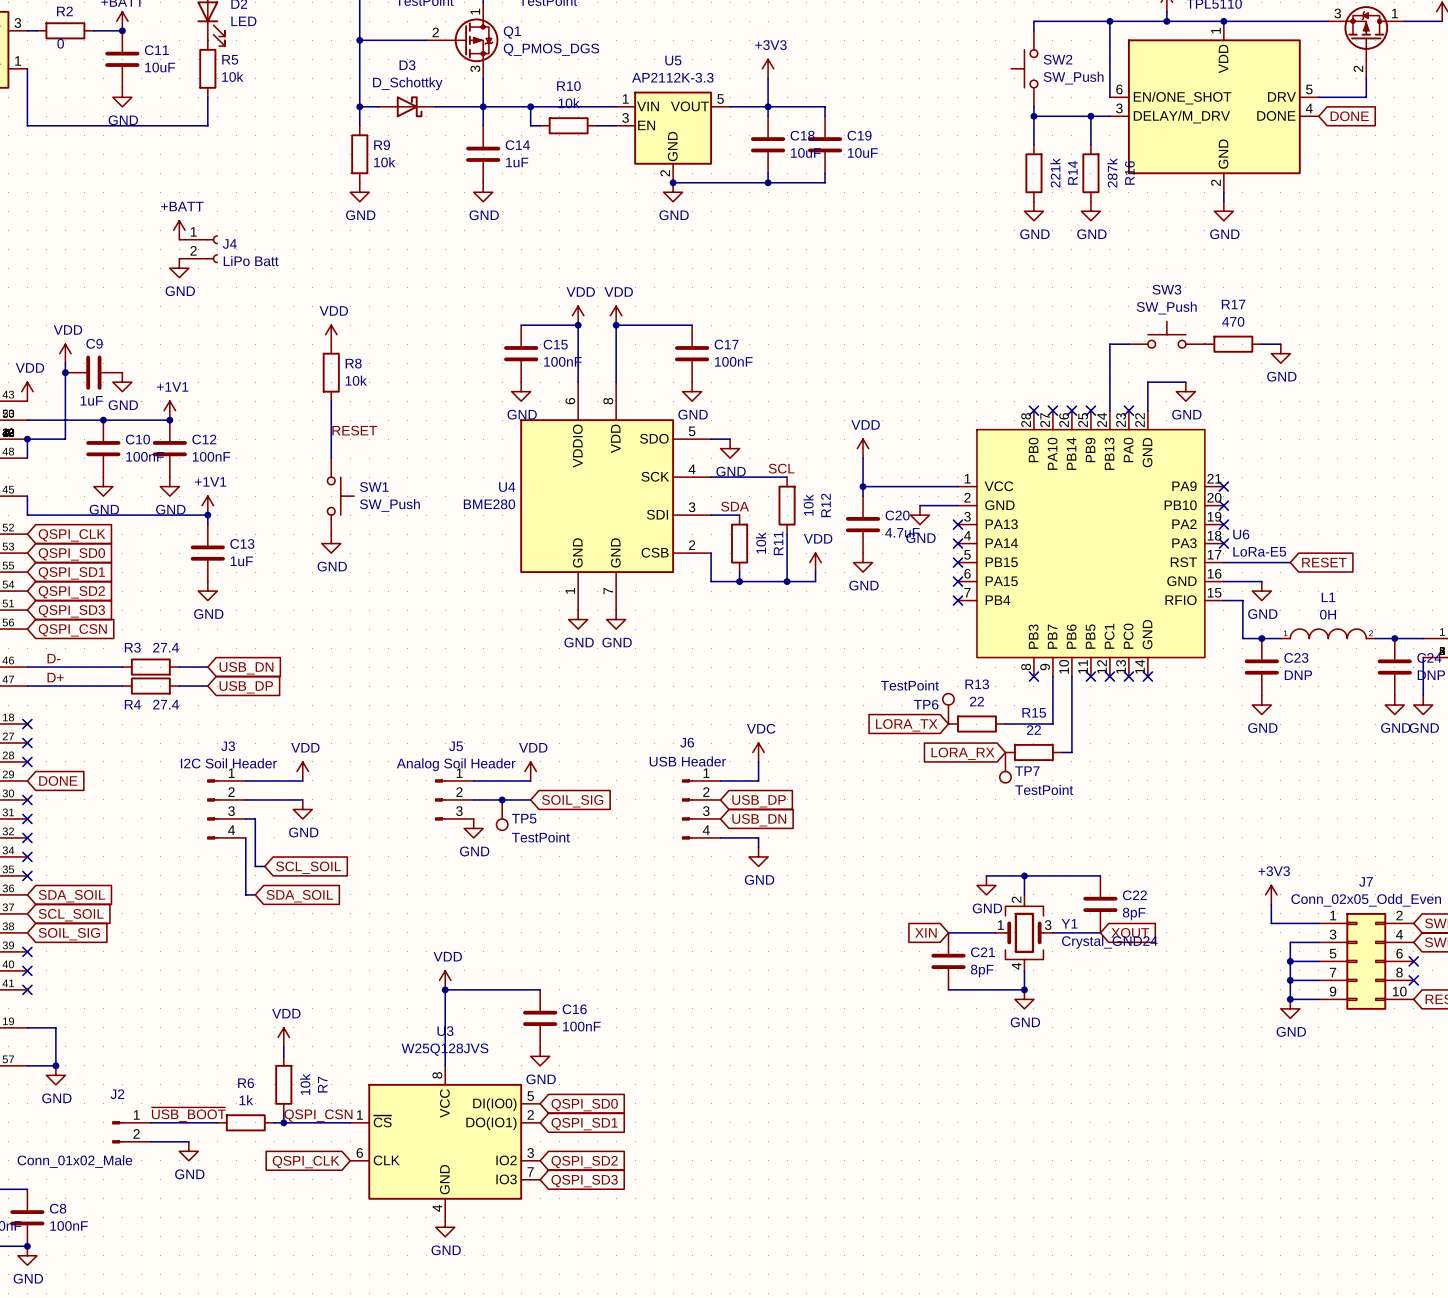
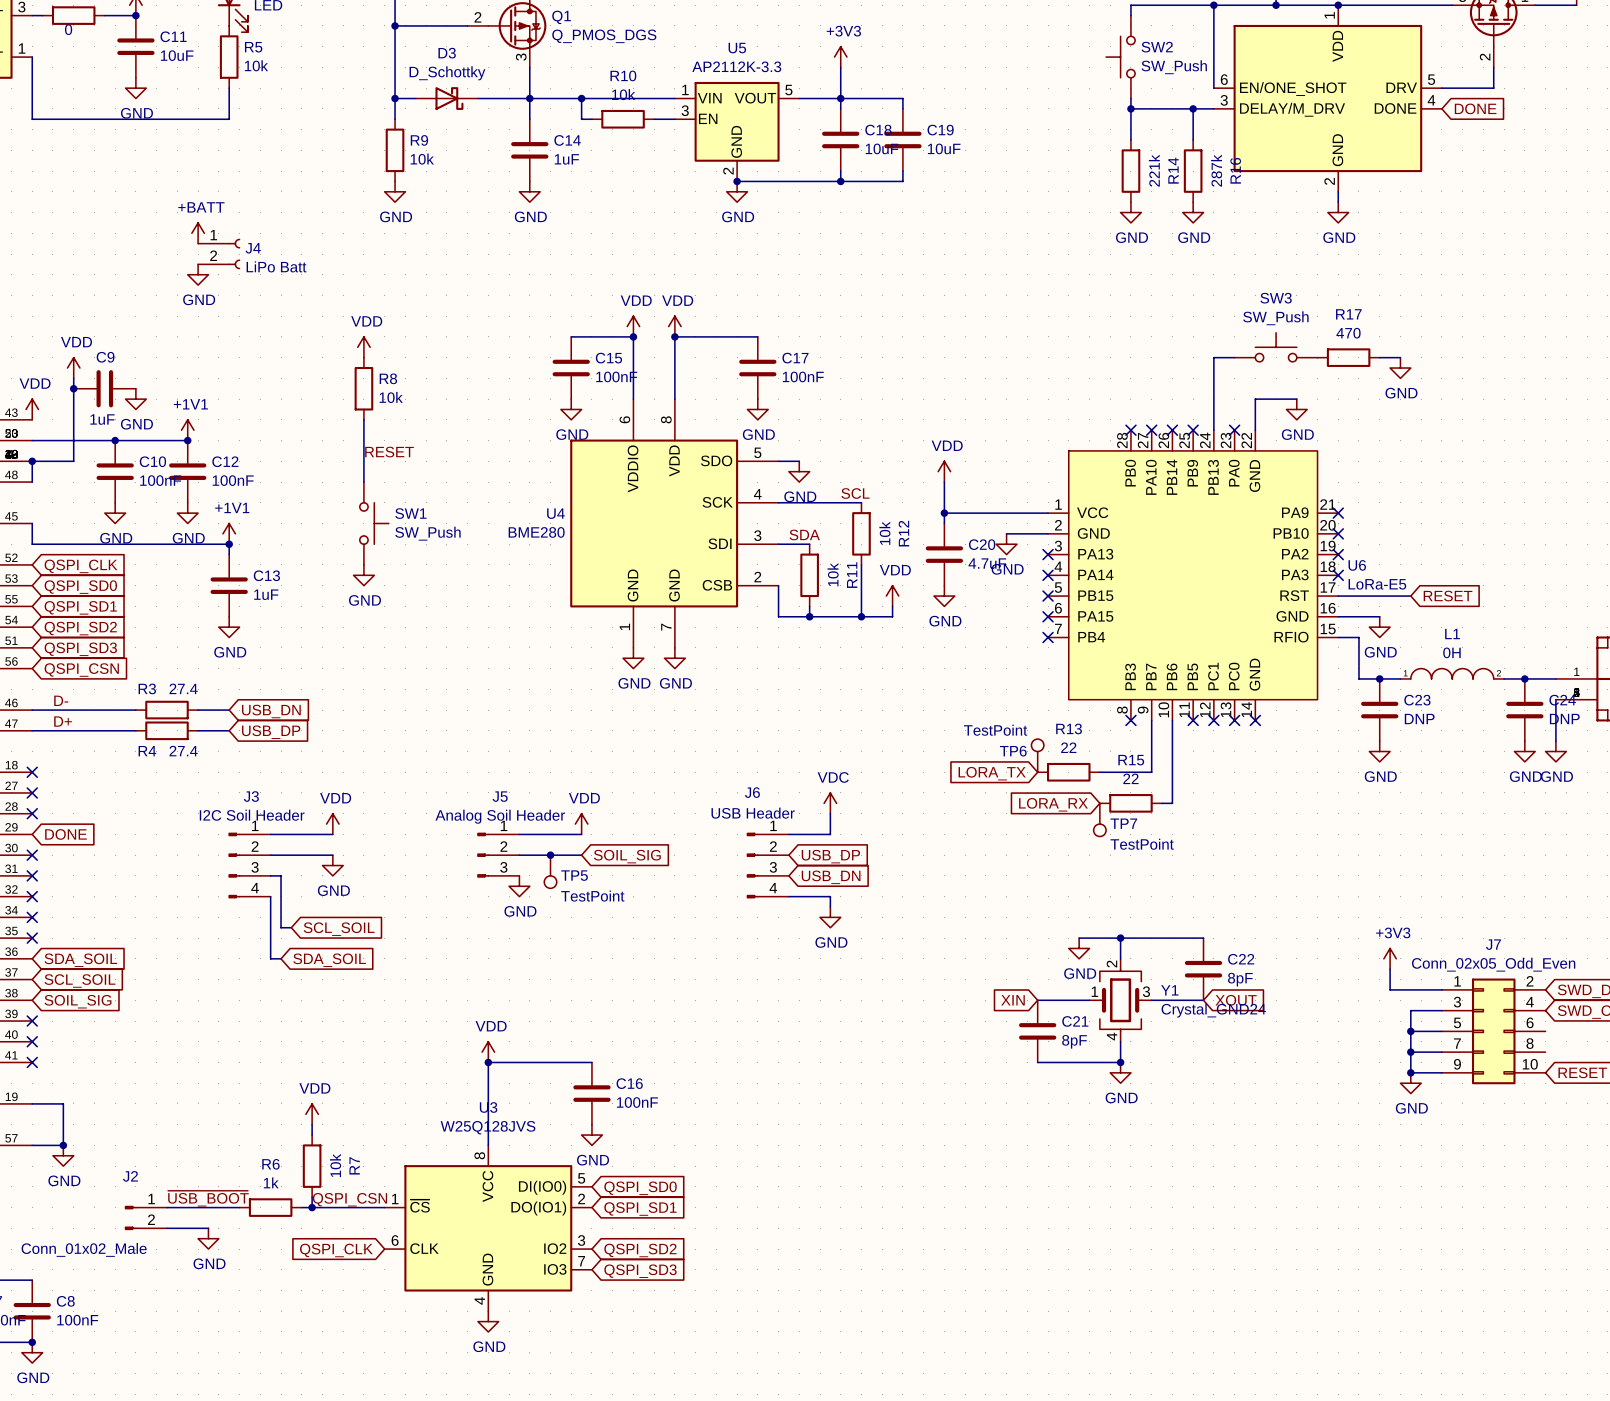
no-connect mark: (1413, 961) -> none
no-connect mark: (1413, 980) -> none

